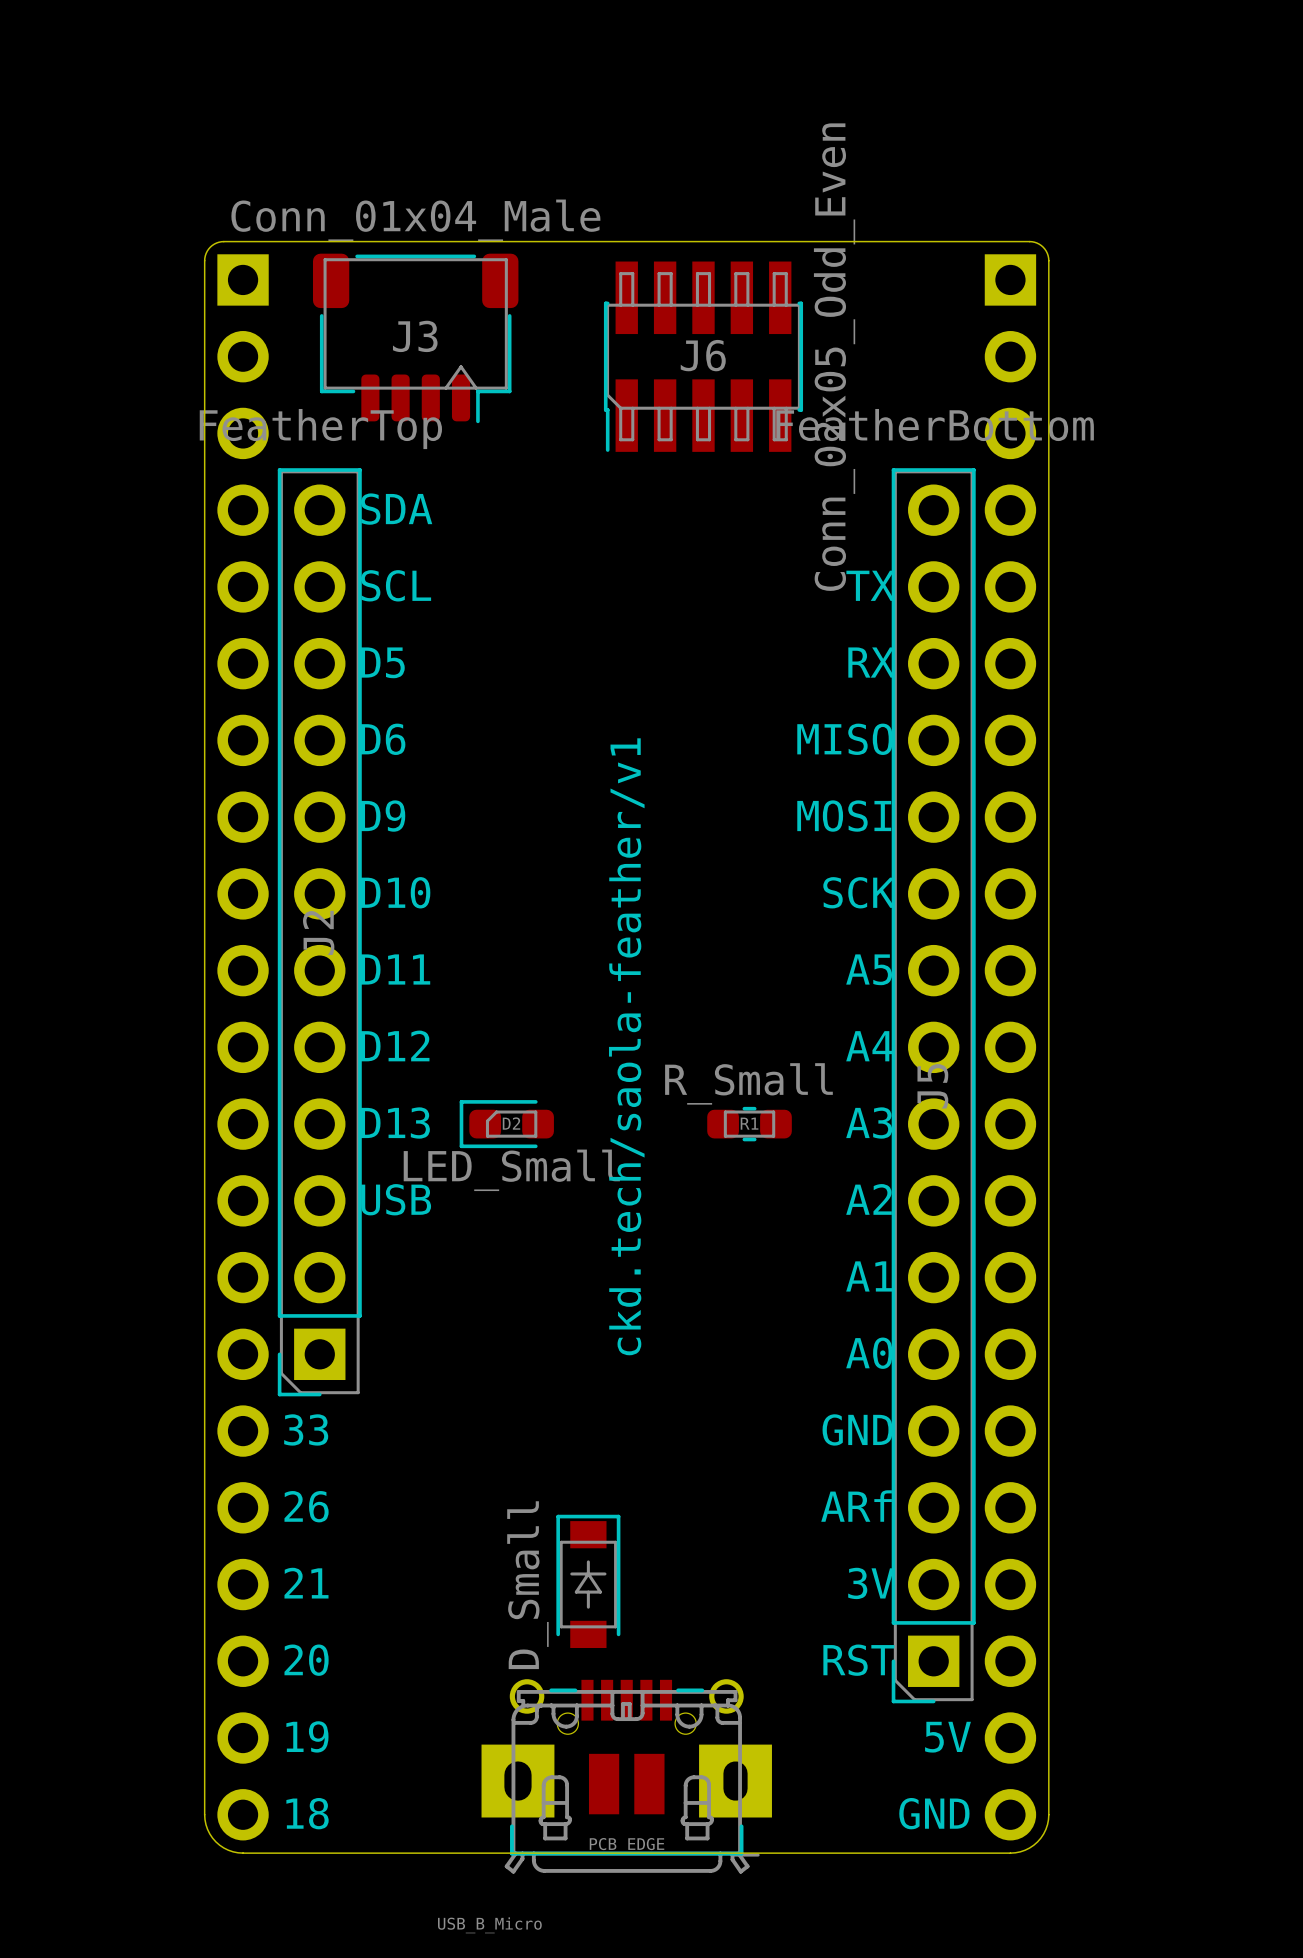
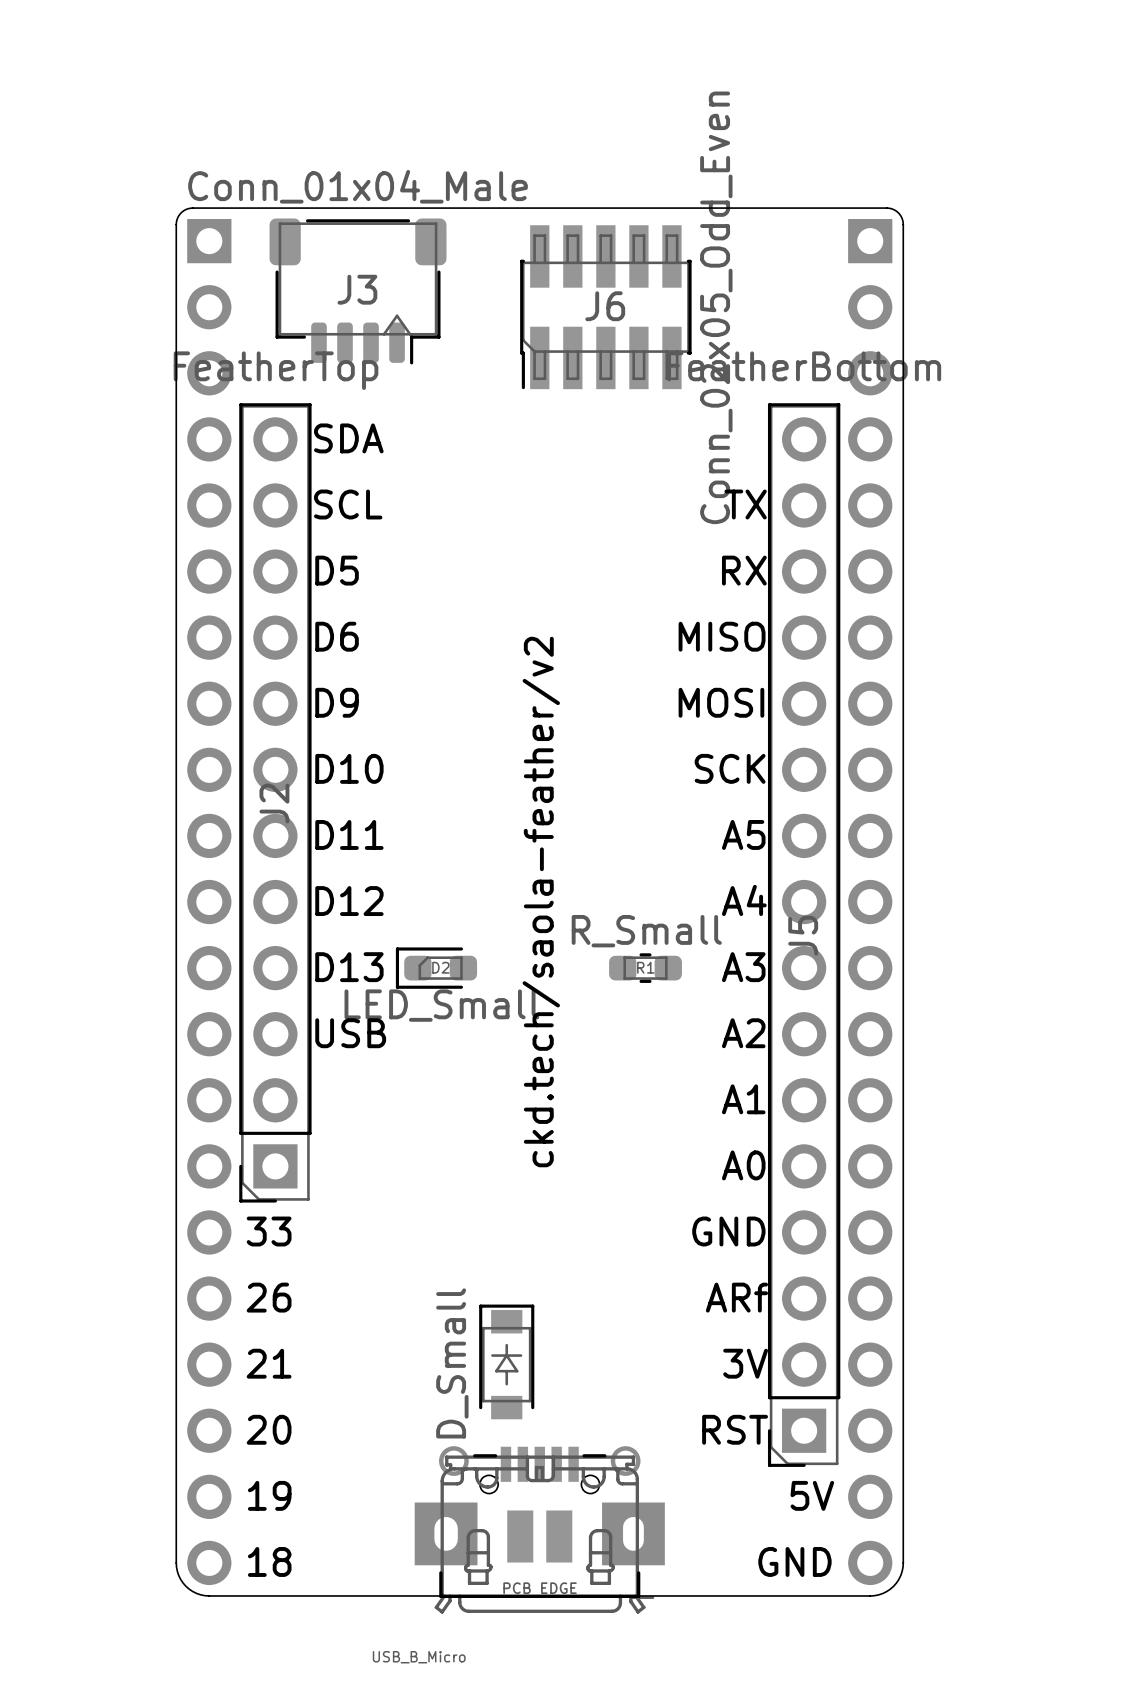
text: ckd.tech/saola-feather/v1 (626, 1046) -> ckd.tech/saola-feather/v2 (541, 902)

